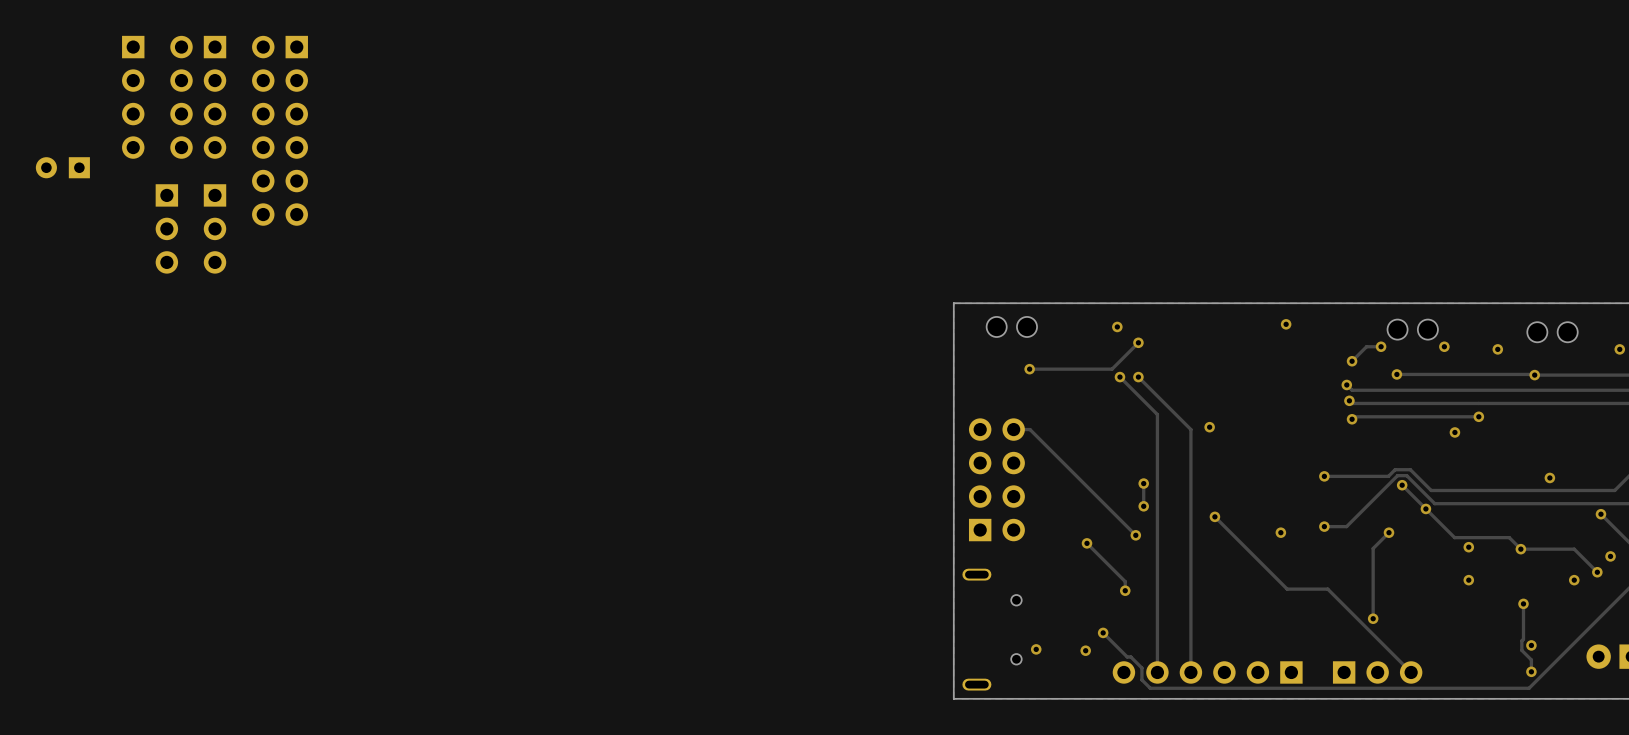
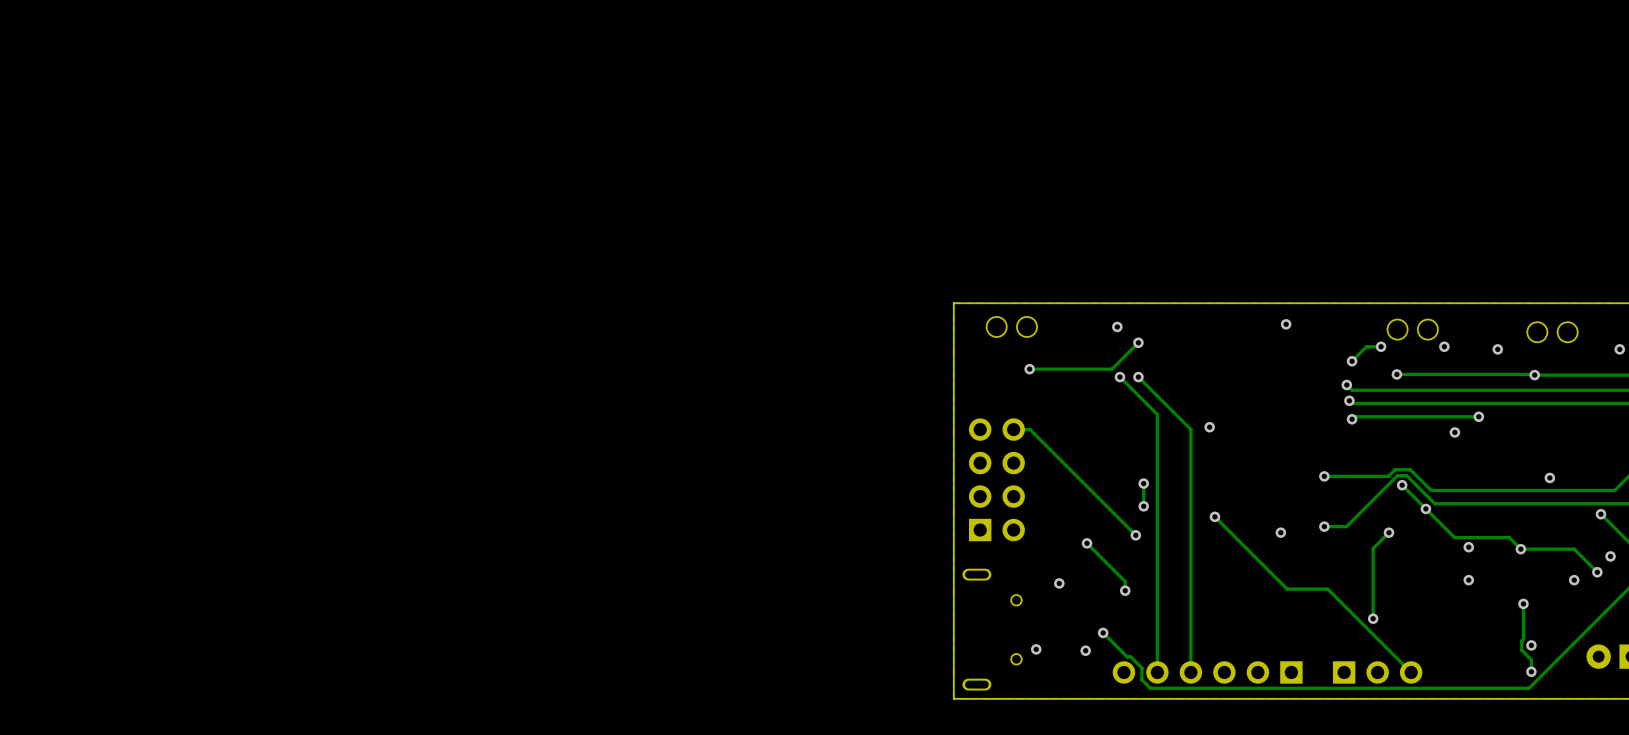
part: (133, 97) -> none
part: (198, 97) -> none
part: (280, 130) -> none
part: (62, 167) -> none
part: (166, 228) -> none
part: (215, 228) -> none
via: none -> (1059, 583)

